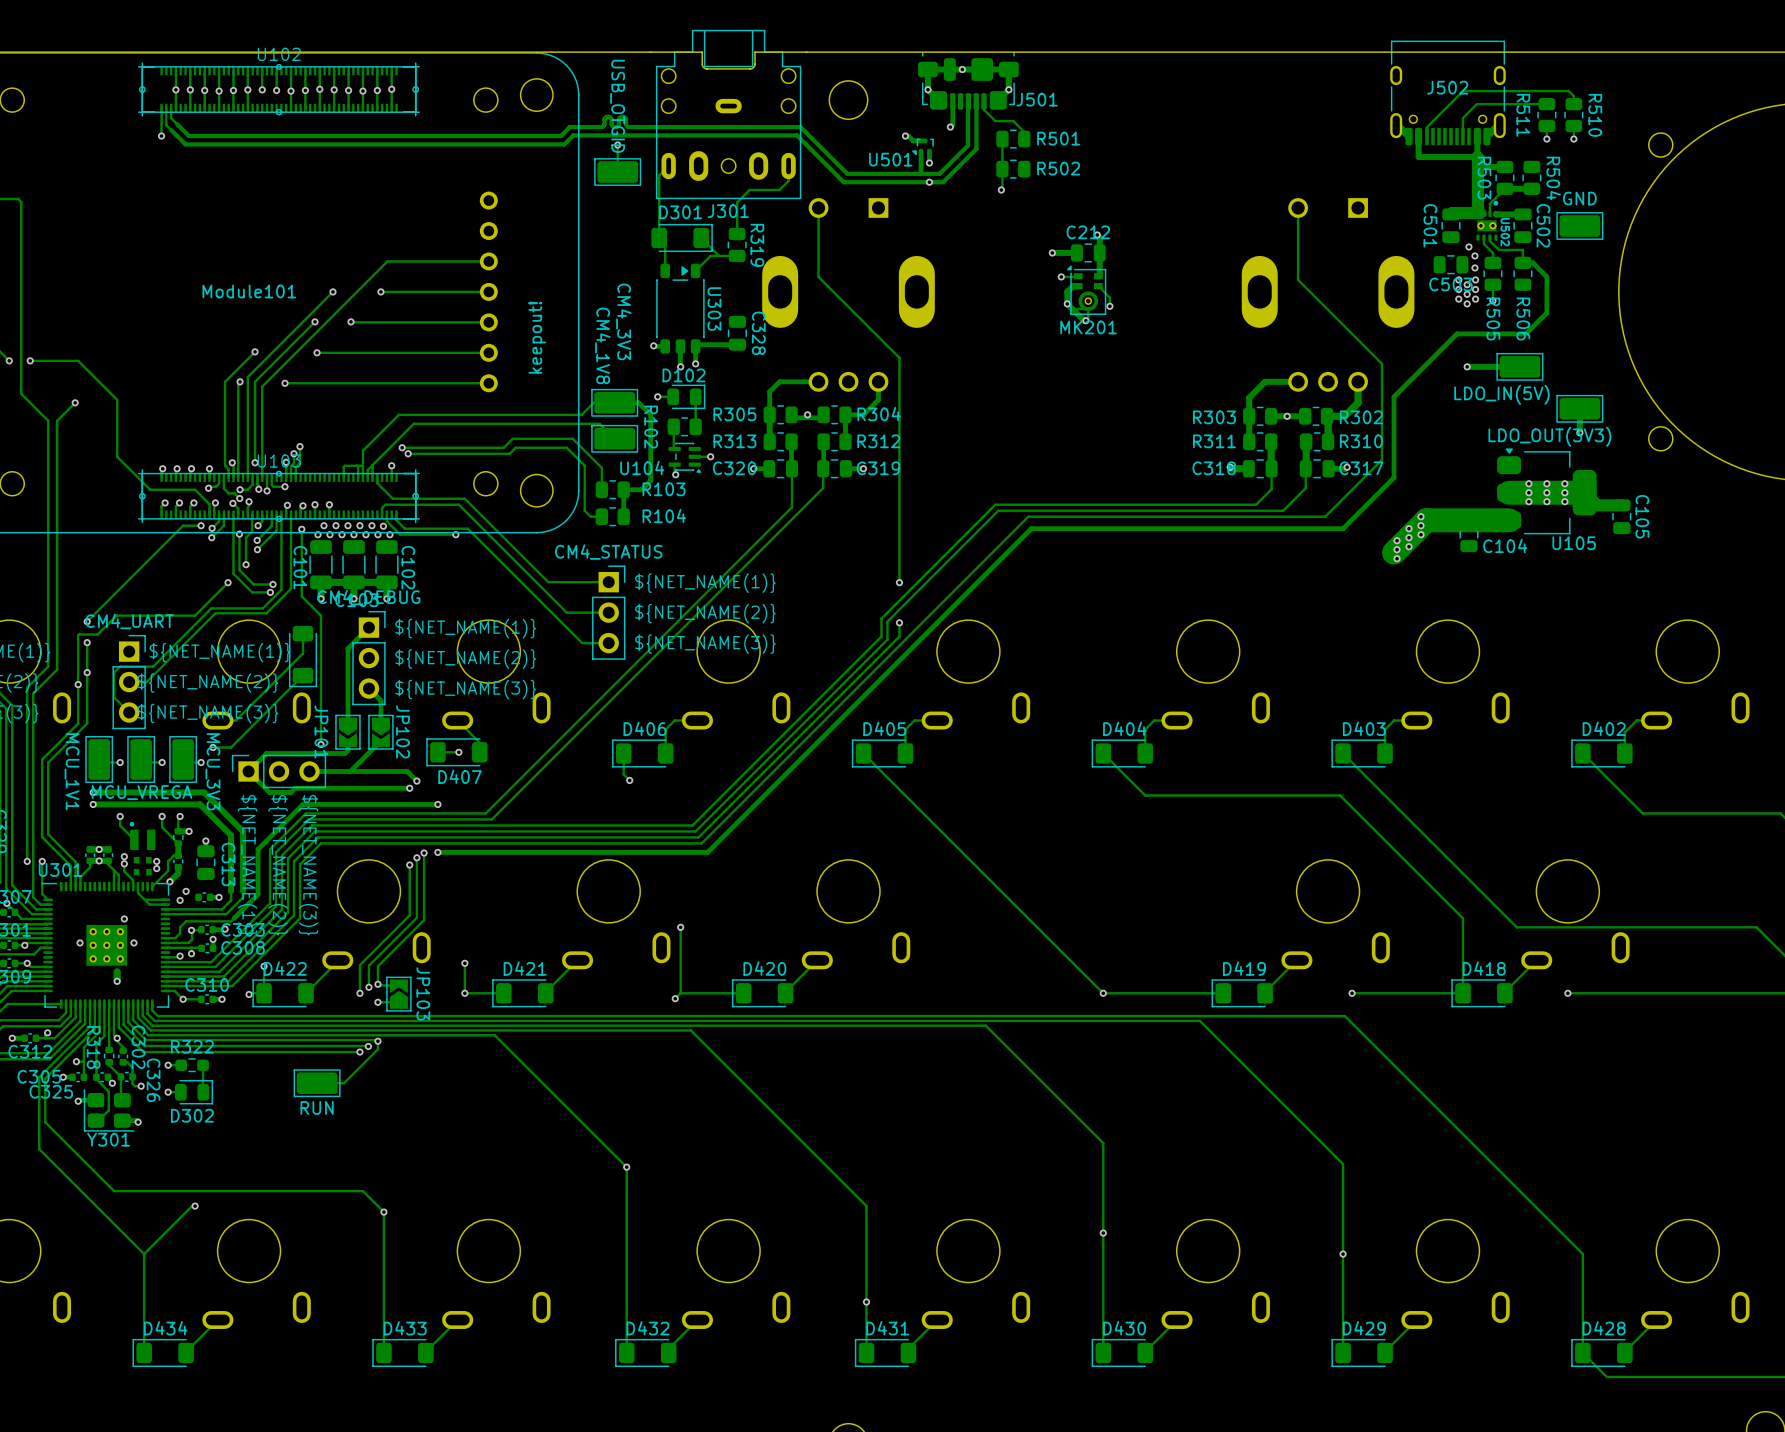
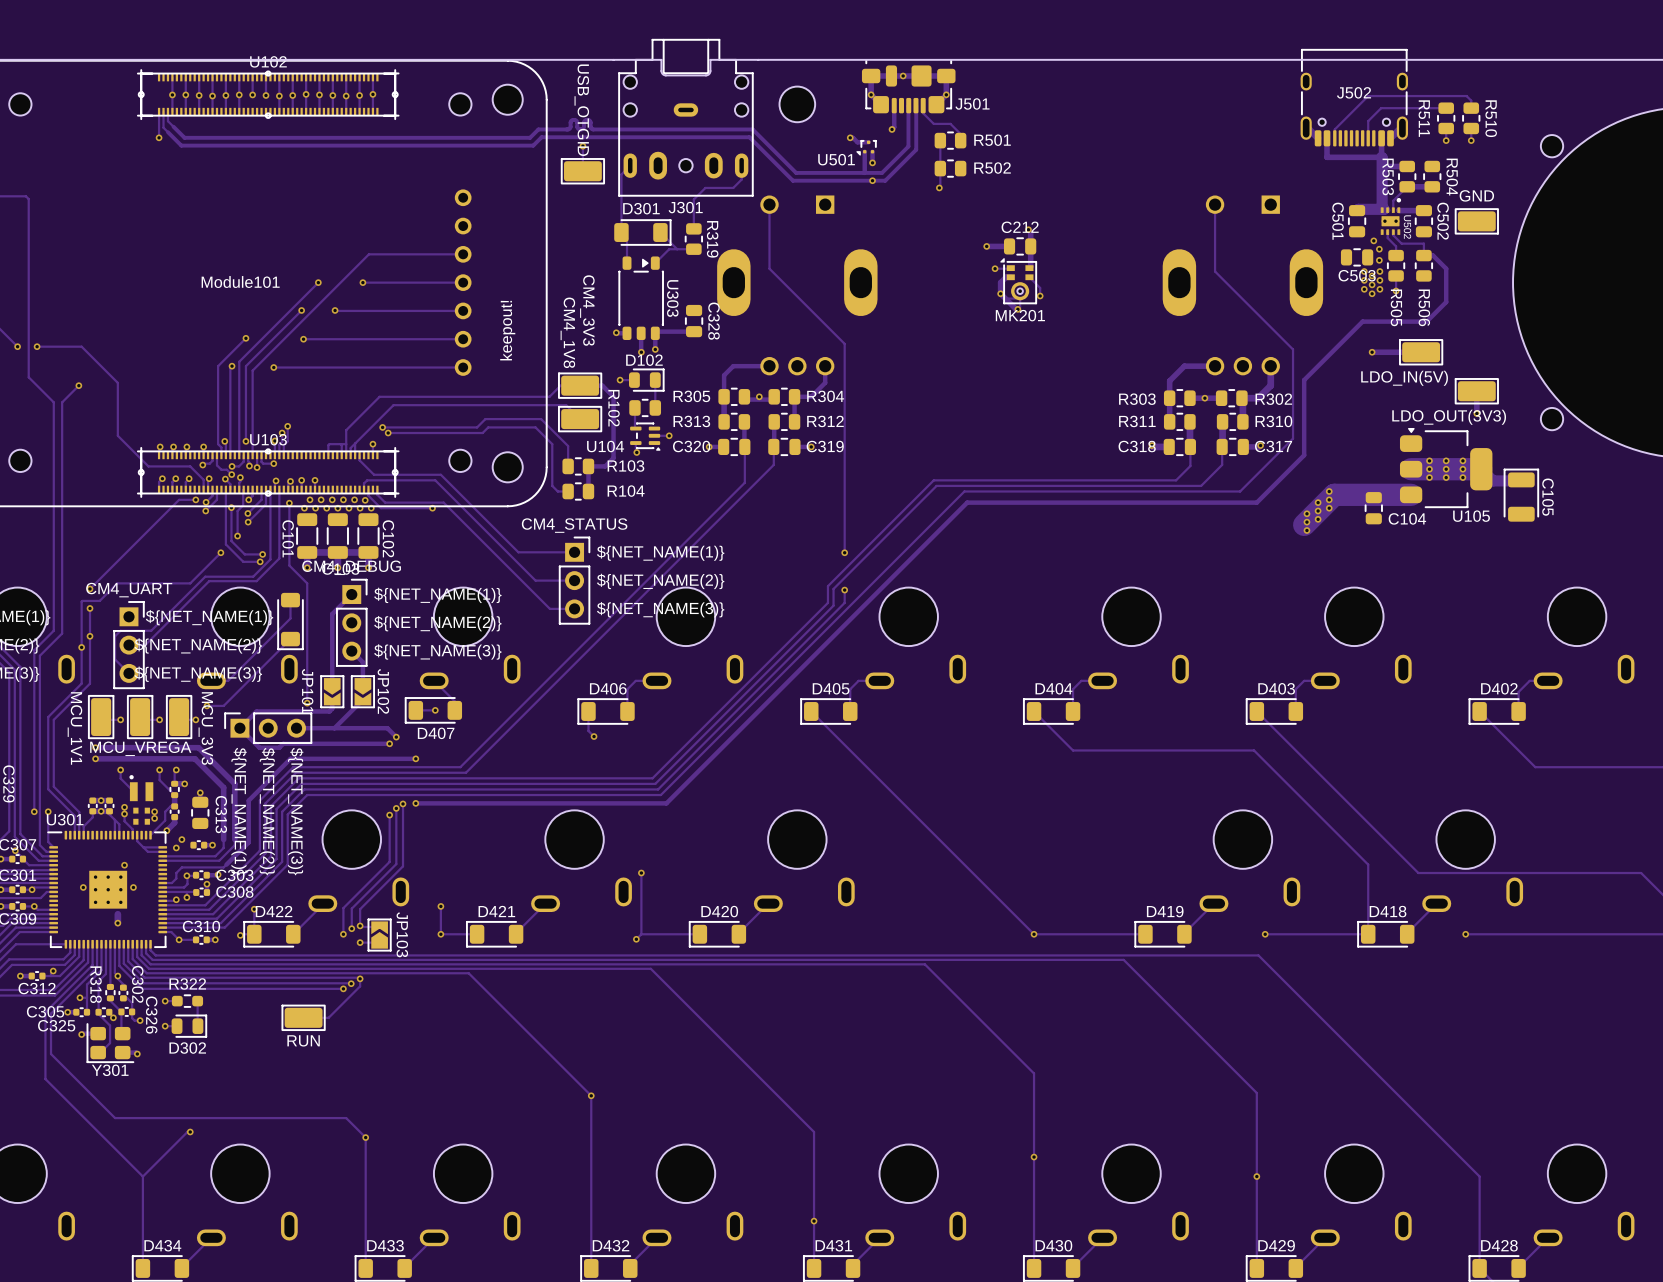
C105 footprint: [1612, 499, 1632, 535] -> [1503, 468, 1539, 522]

